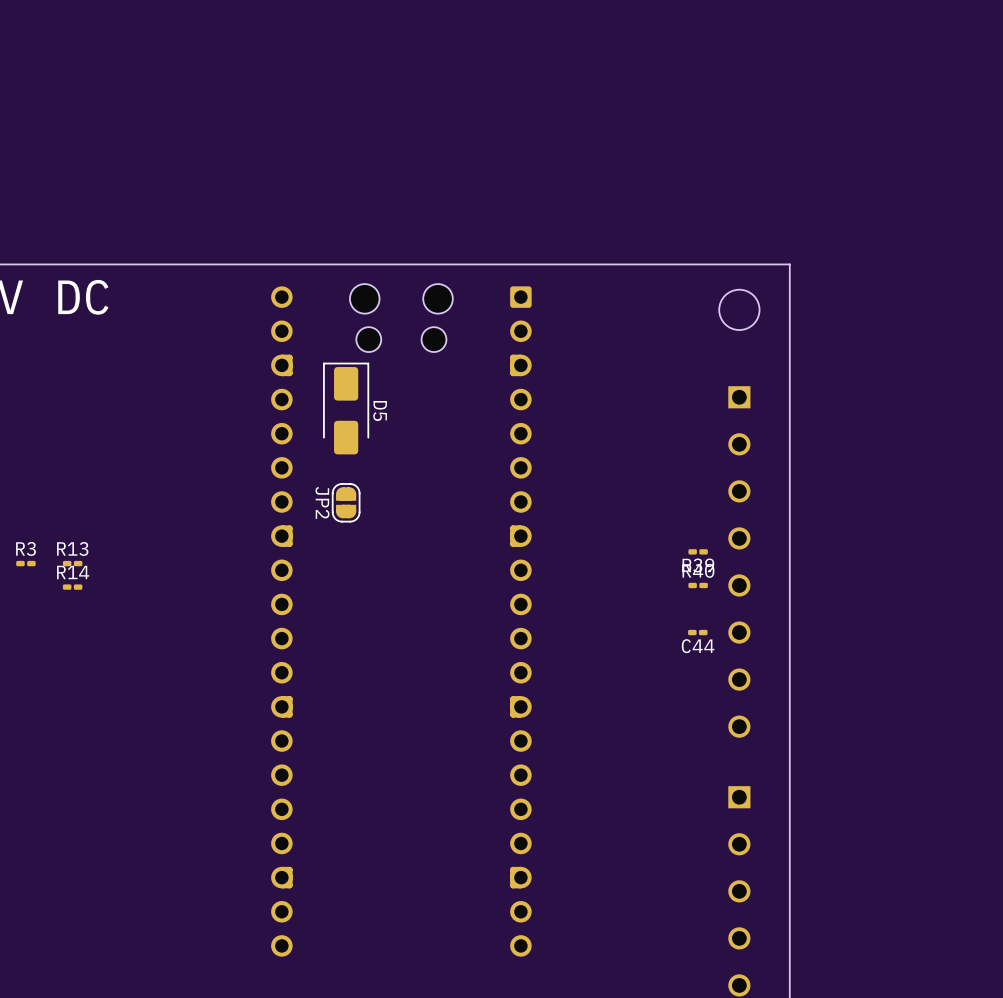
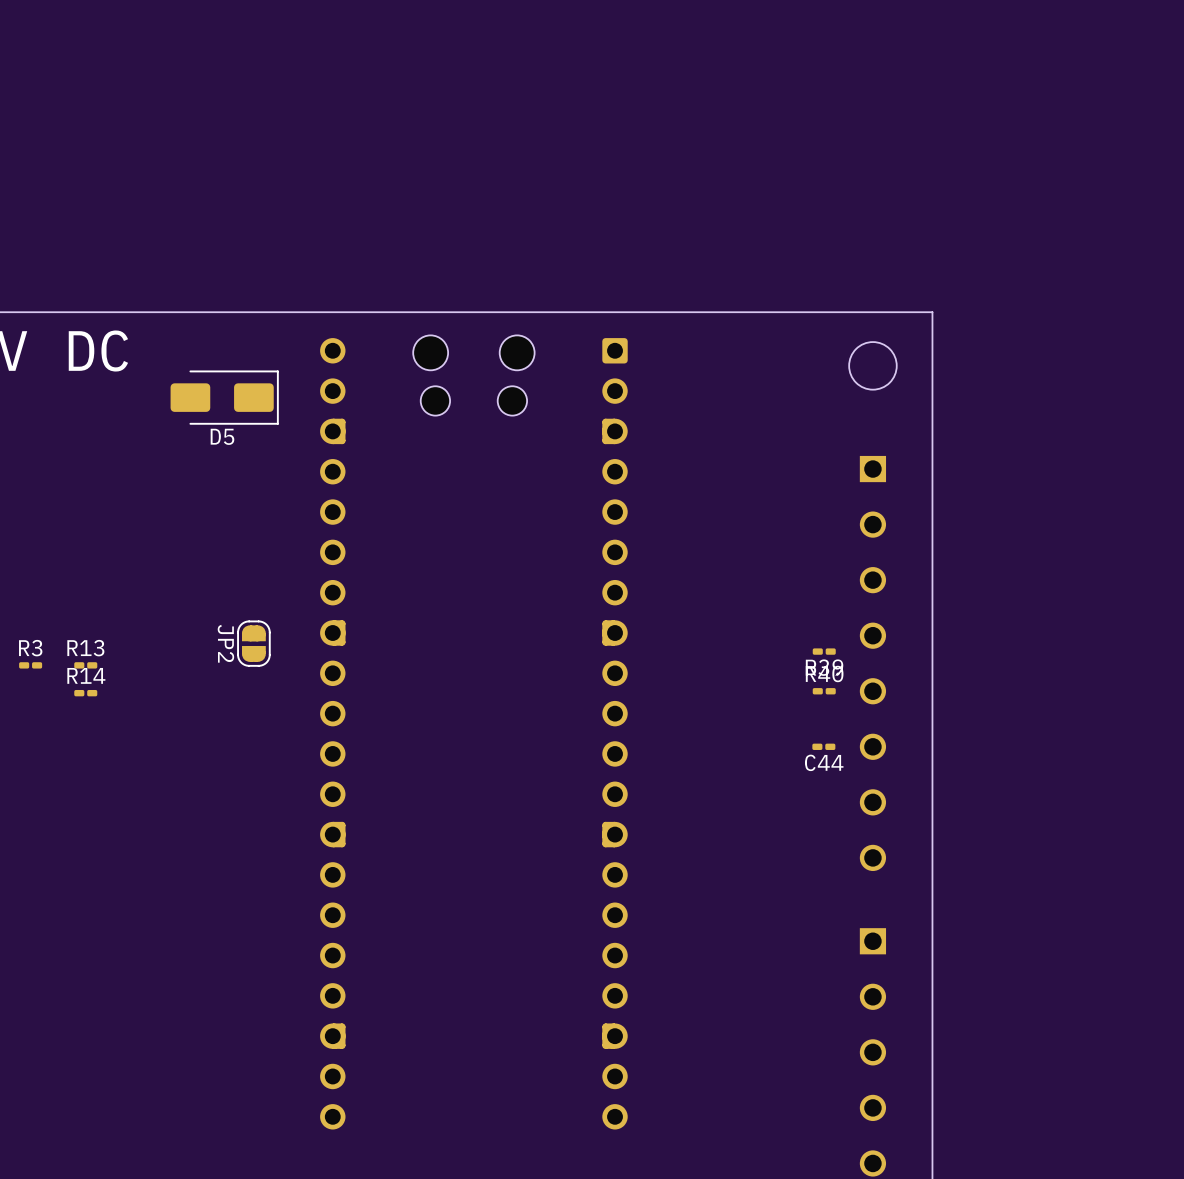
D5 rotation: 0° (346, 408) -> 90° clockwise (224, 397)
D5 position: (346, 408) -> (224, 397)
JP2 position: (346, 502) -> (253, 643)

